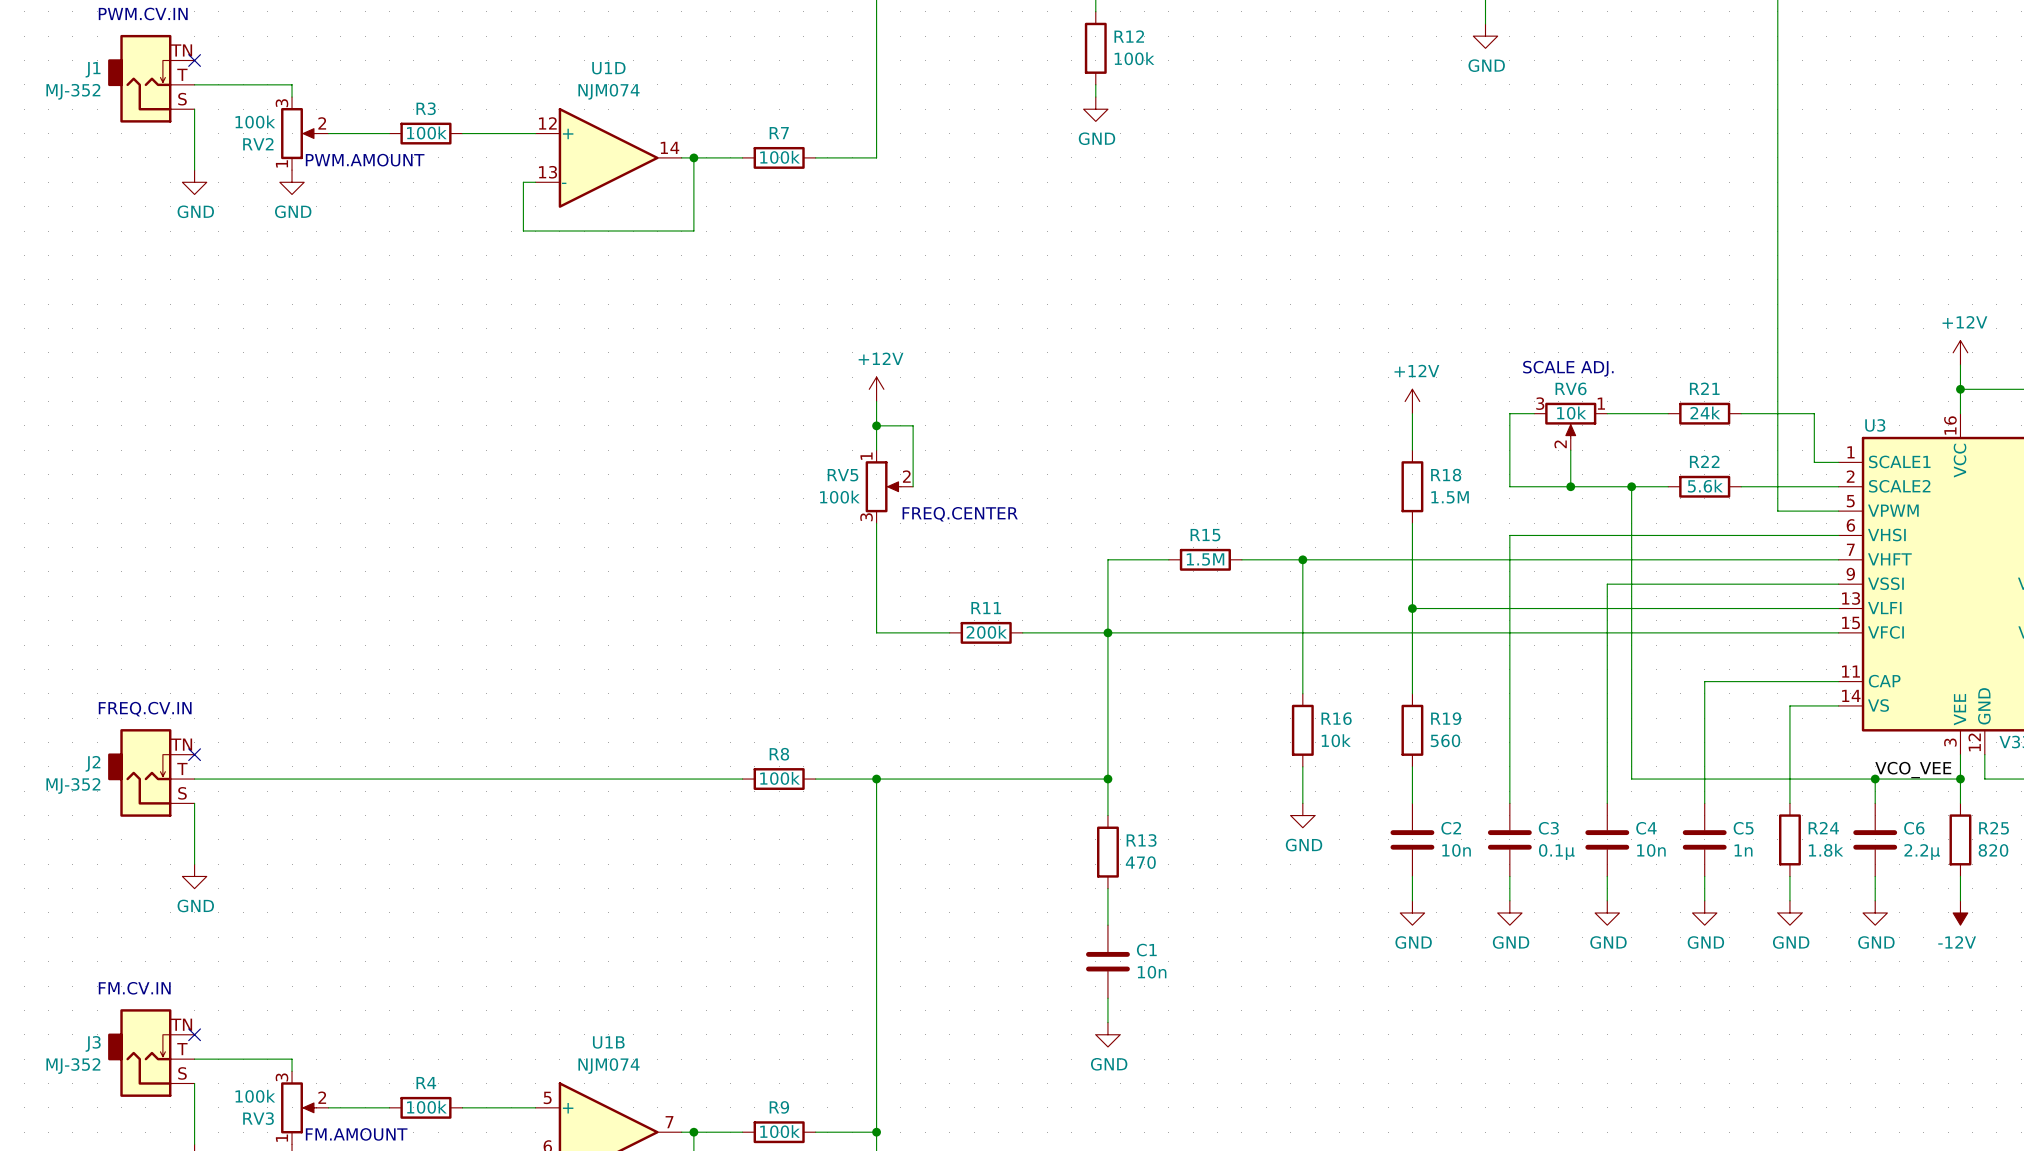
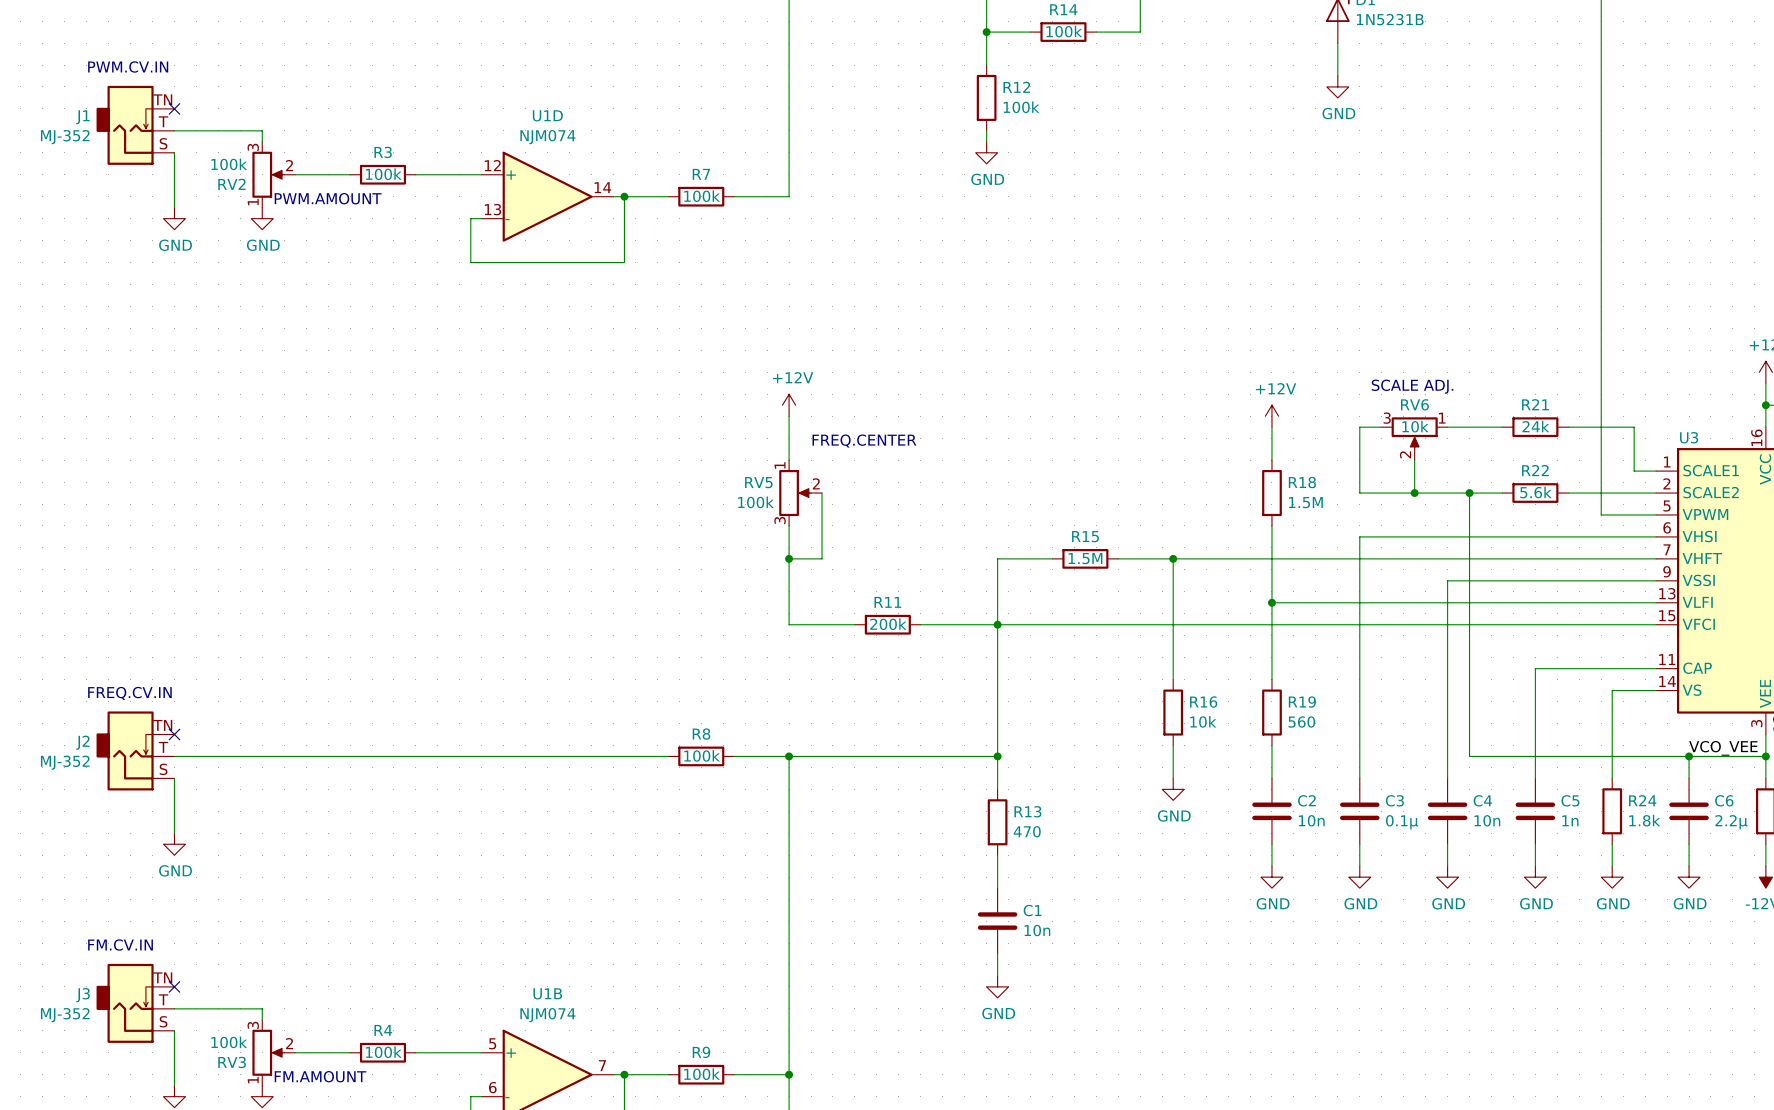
wire: (876, 425) (913, 425) (913, 486) -> (789, 558) (822, 558) (822, 493)
junction: (876, 425) -> none
text position: FREQ.CENTER (960, 514) -> FREQ.CENTER (864, 441)
junction: none -> (789, 558)

